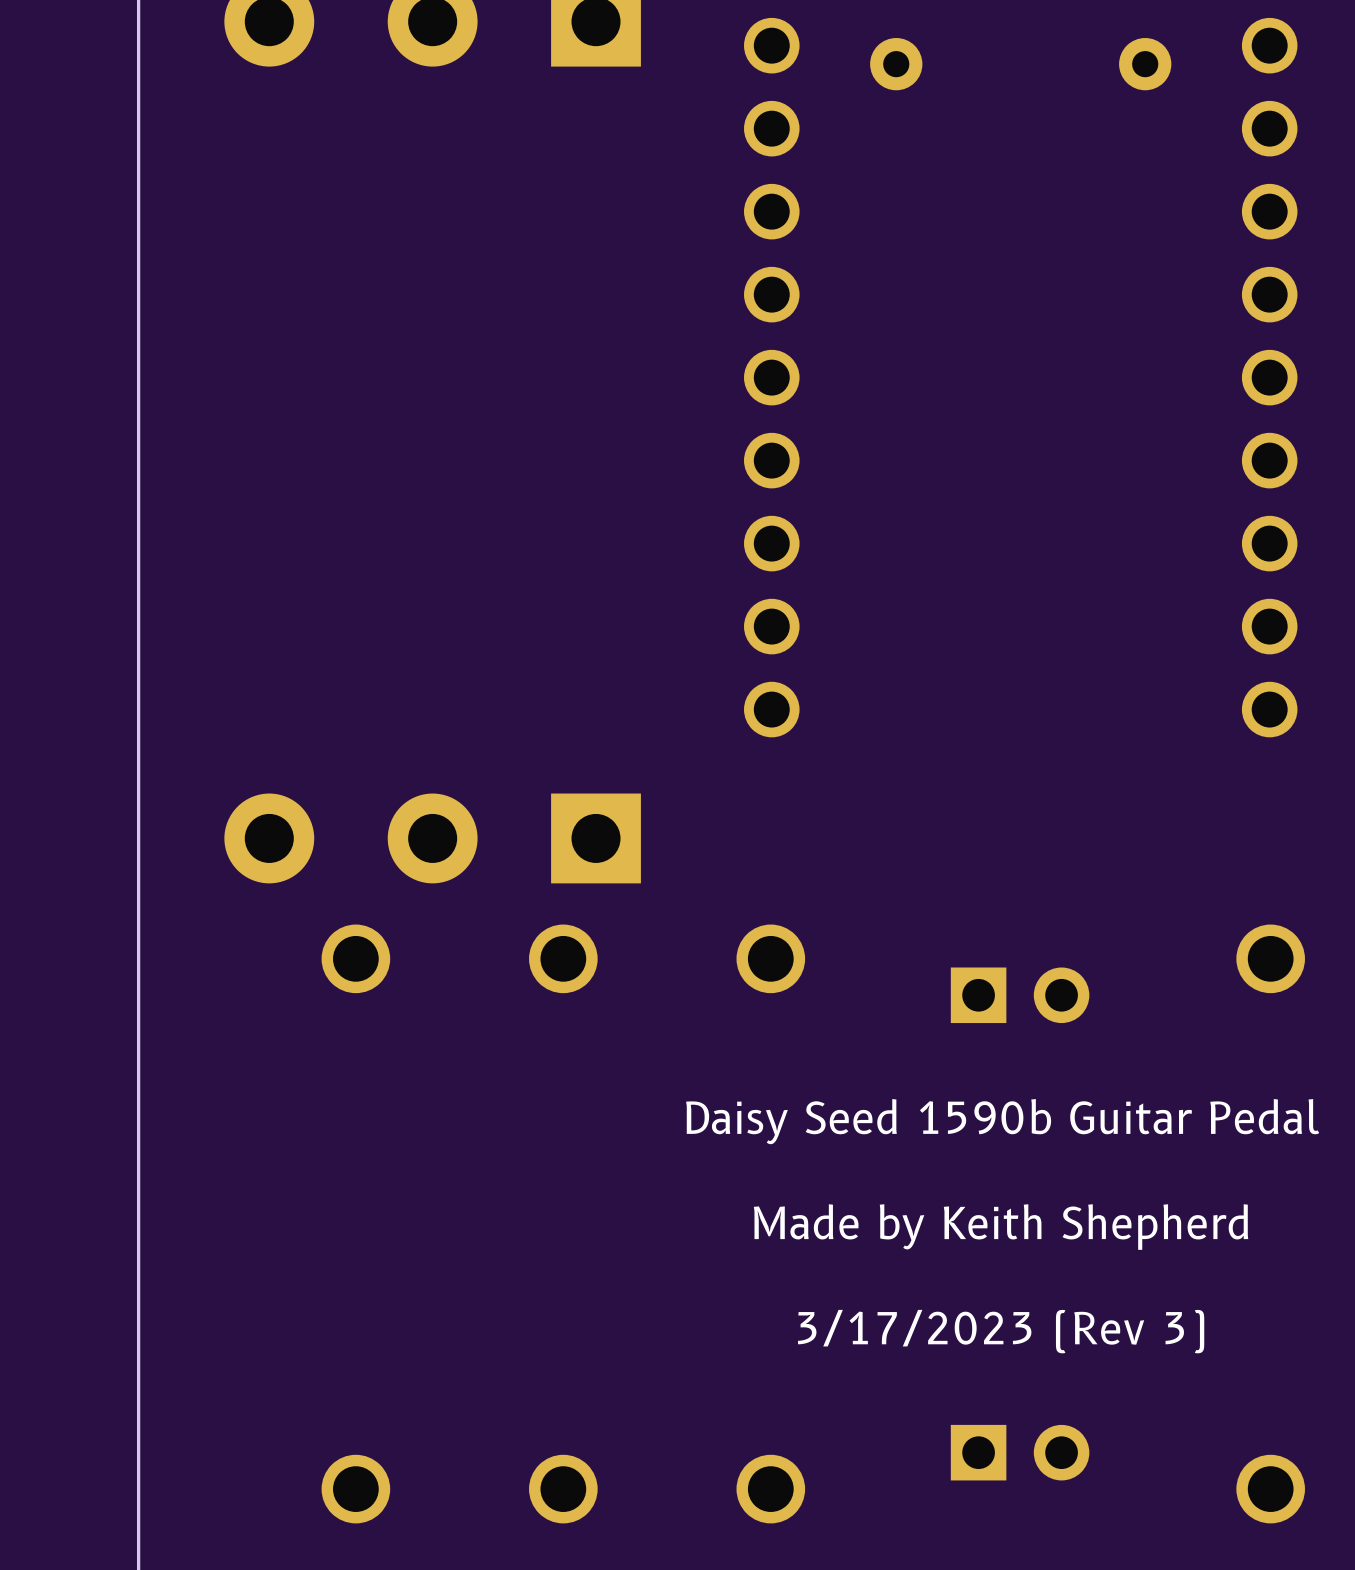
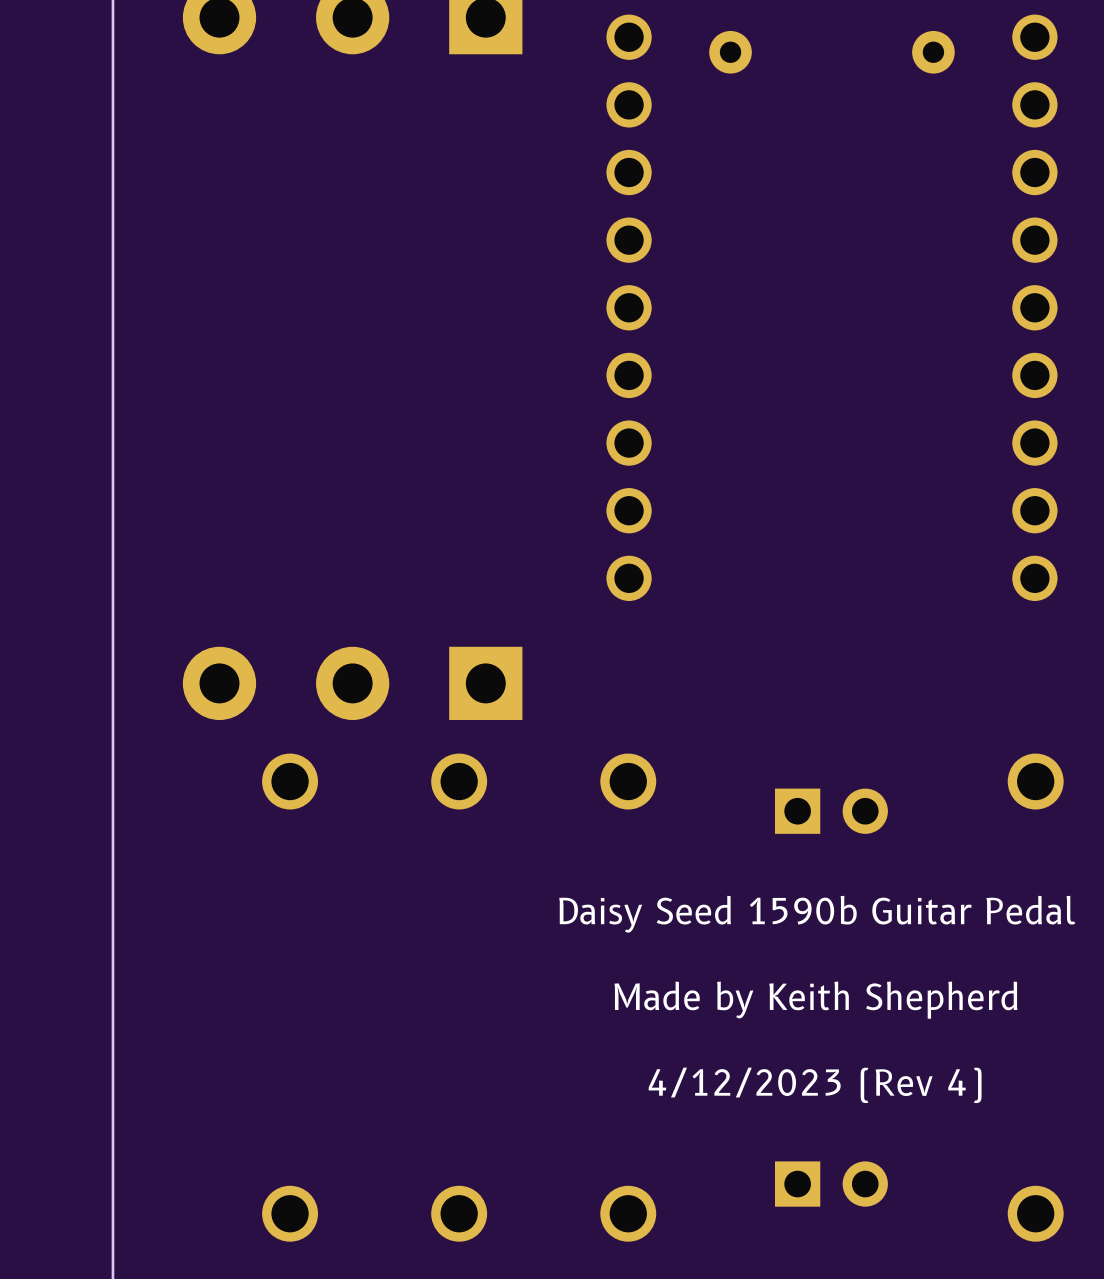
text: 3/17/2023 (Rev 3) (1001, 1331) -> 4/12/2023 (Rev 4) (815, 1085)

